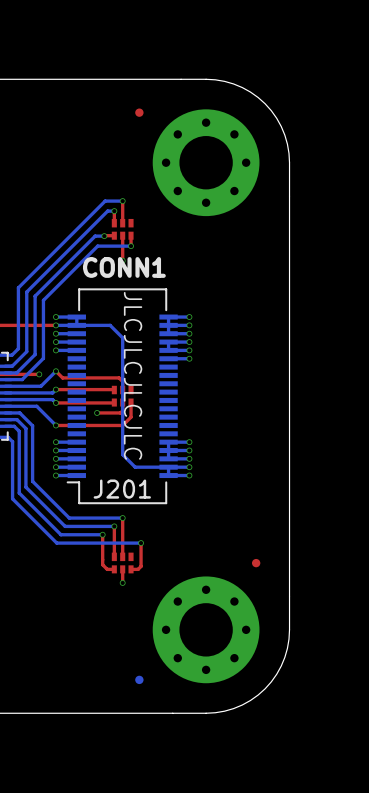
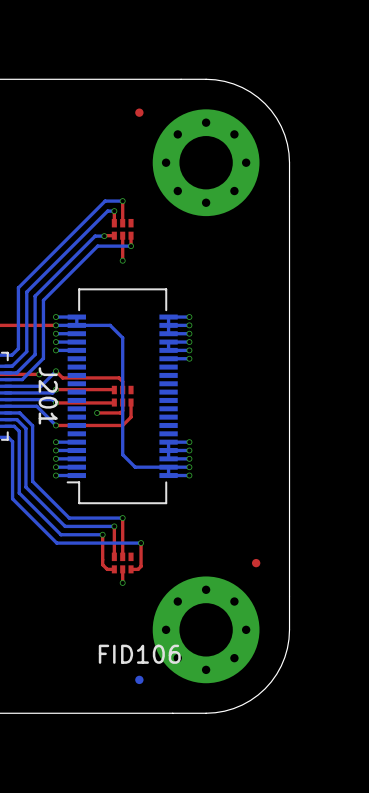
text: CONN1 (124, 267) -> none
text: JLCJLCJLCJLC (133, 375) -> none
J201 name rotation: 0° (122, 489) -> 90° clockwise (48, 395)
J201 name position: J201 (122, 489) -> J201 (48, 395)
FID106 name: none -> FID106 (139, 654)

